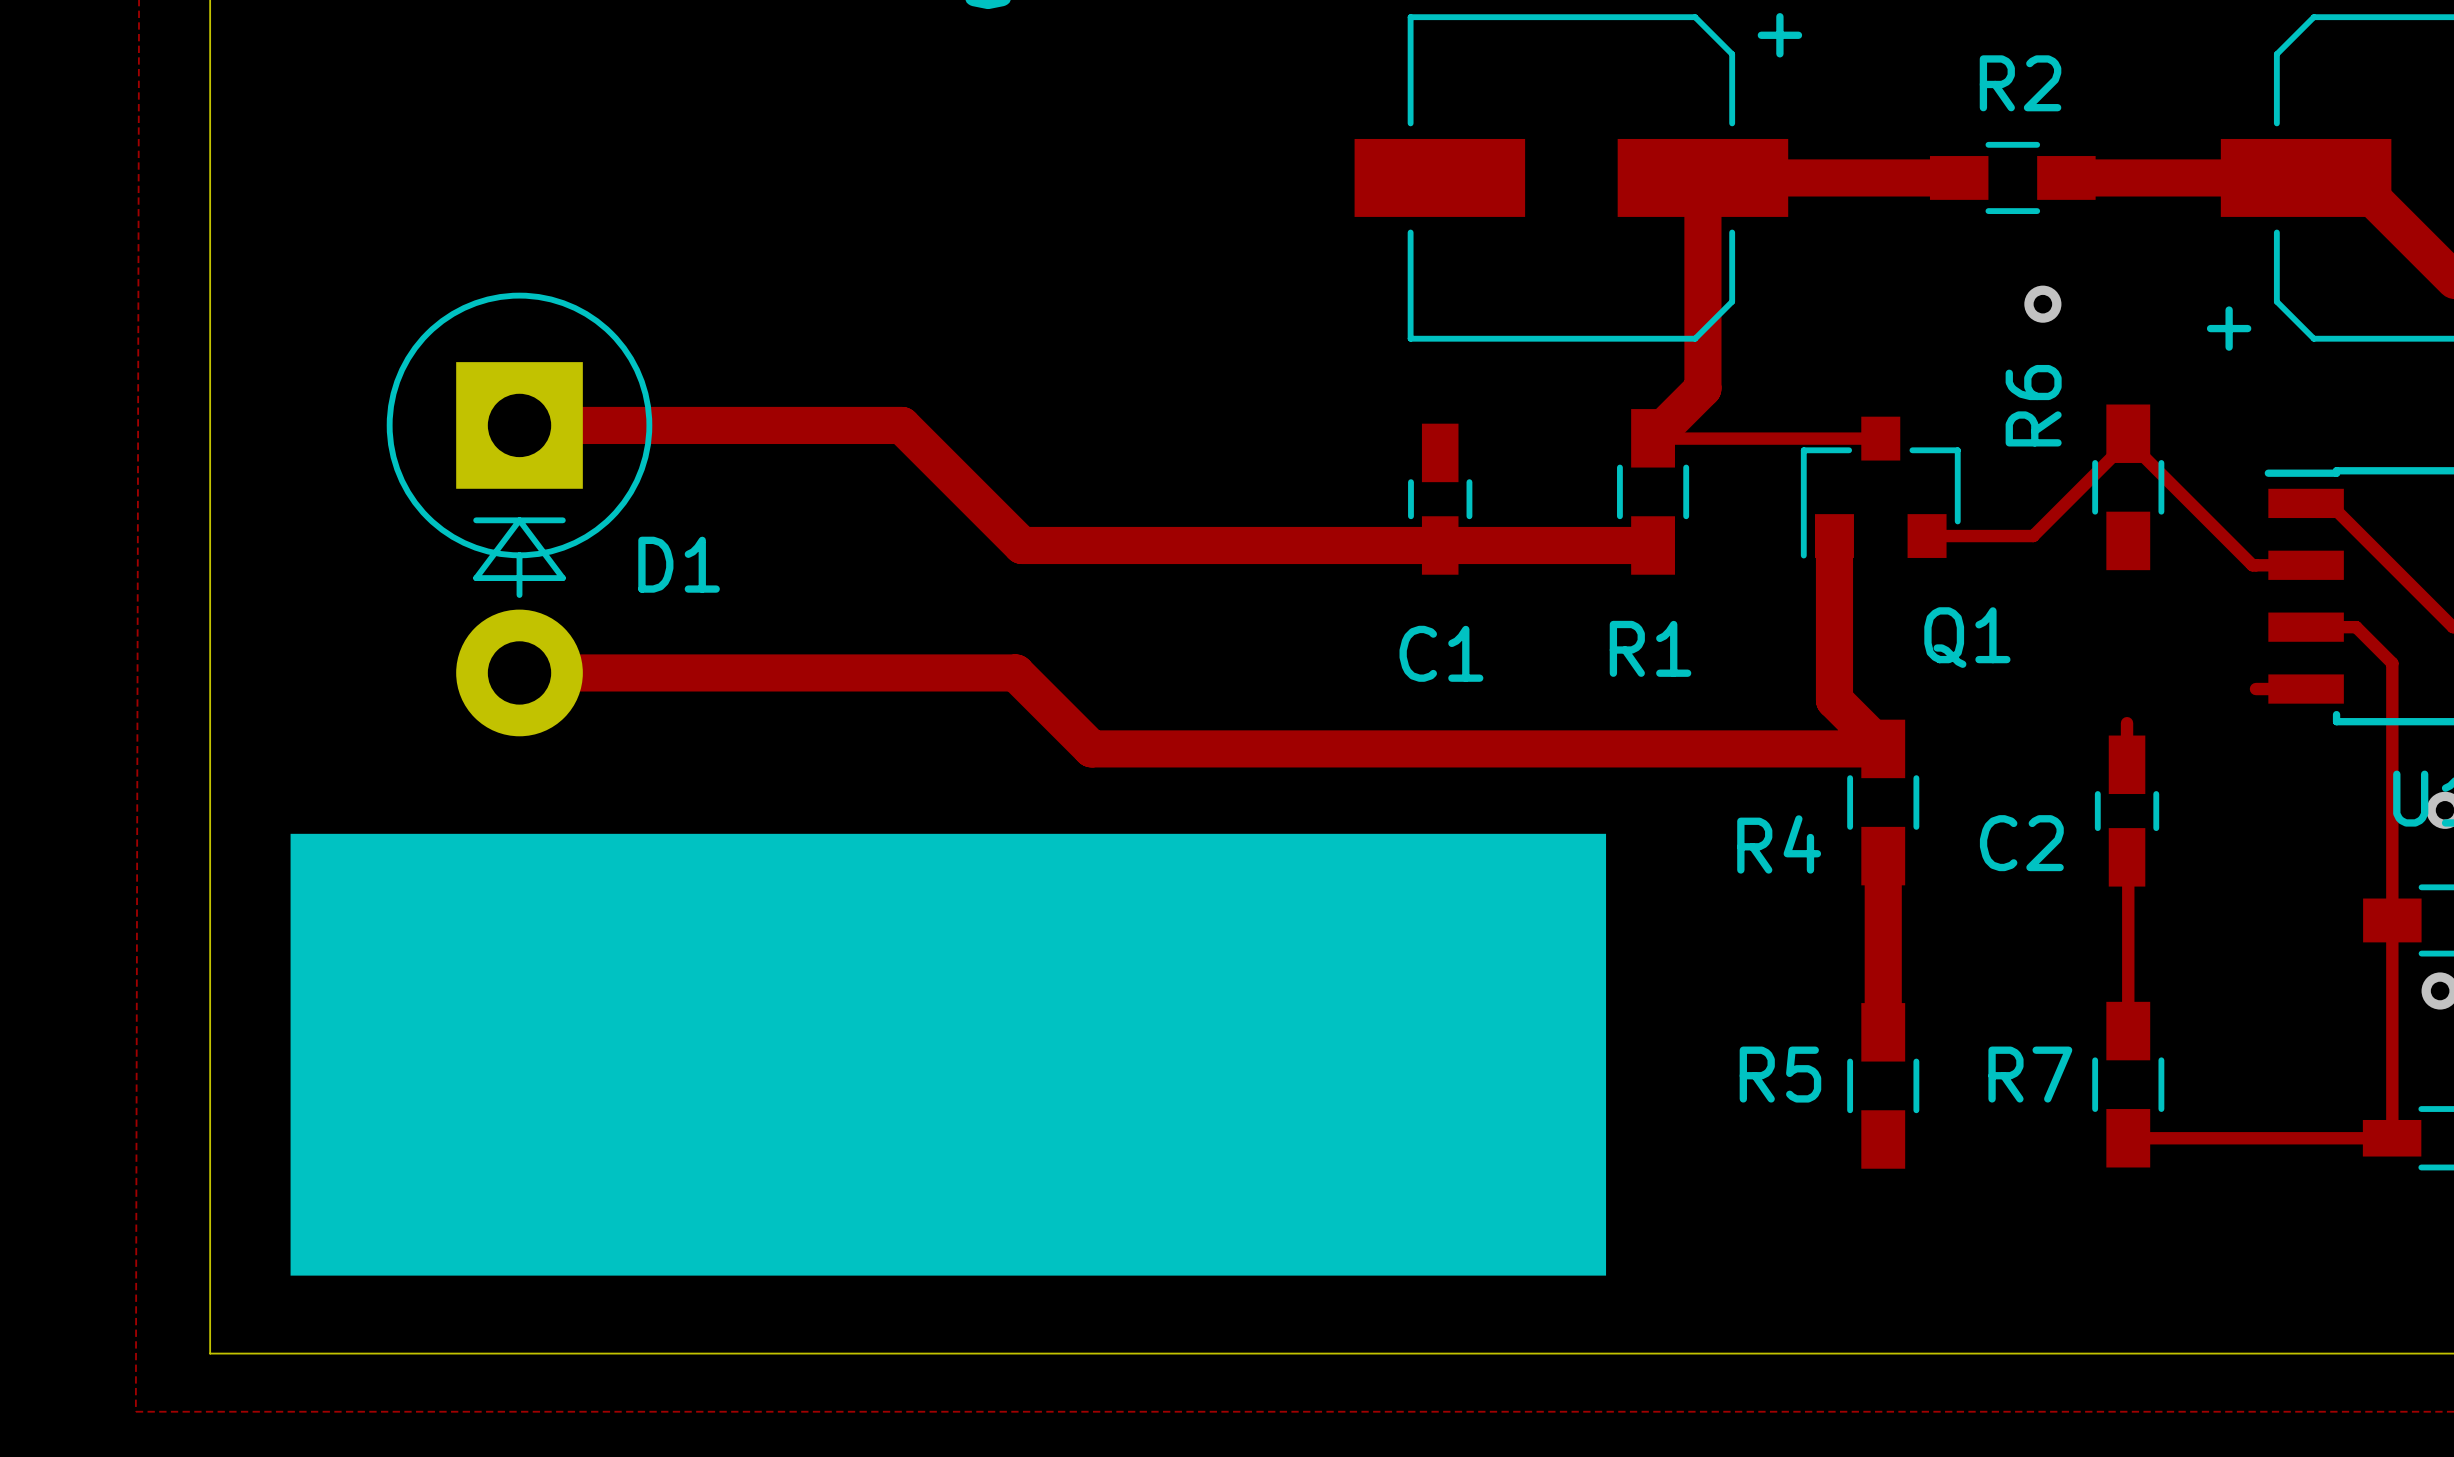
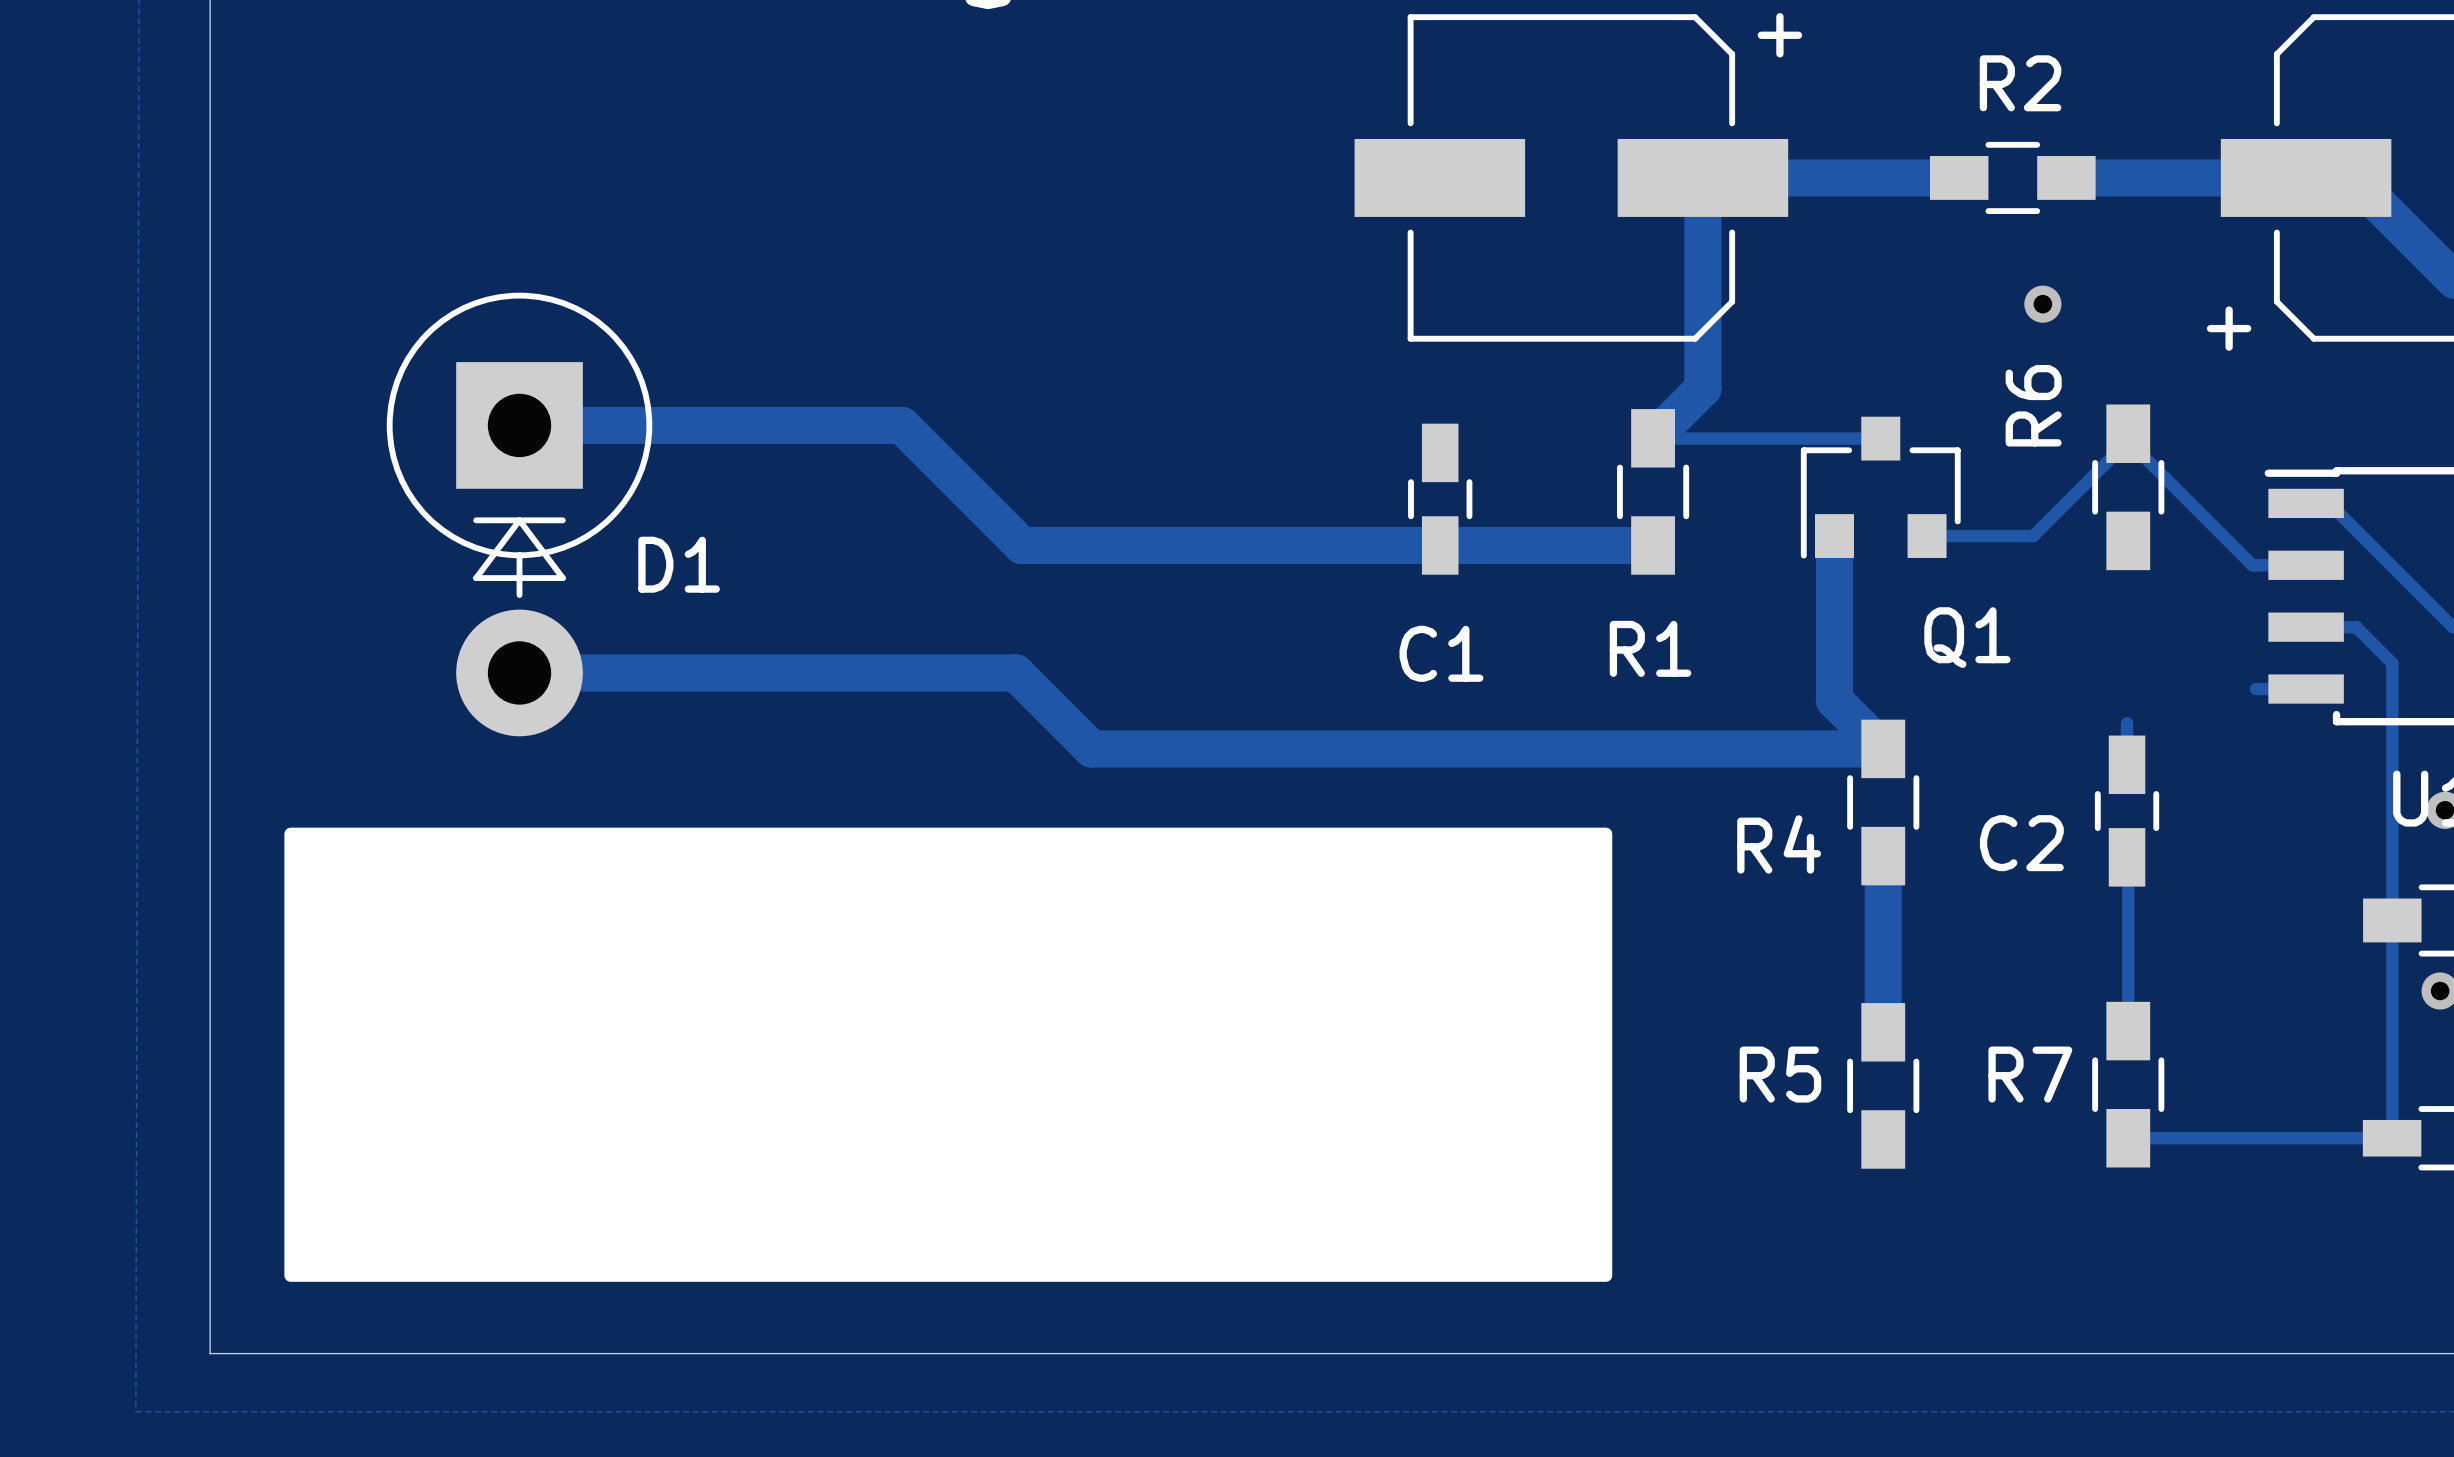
drawing shape: [290, 833, 1607, 1276] -> [284, 827, 1613, 1282]

